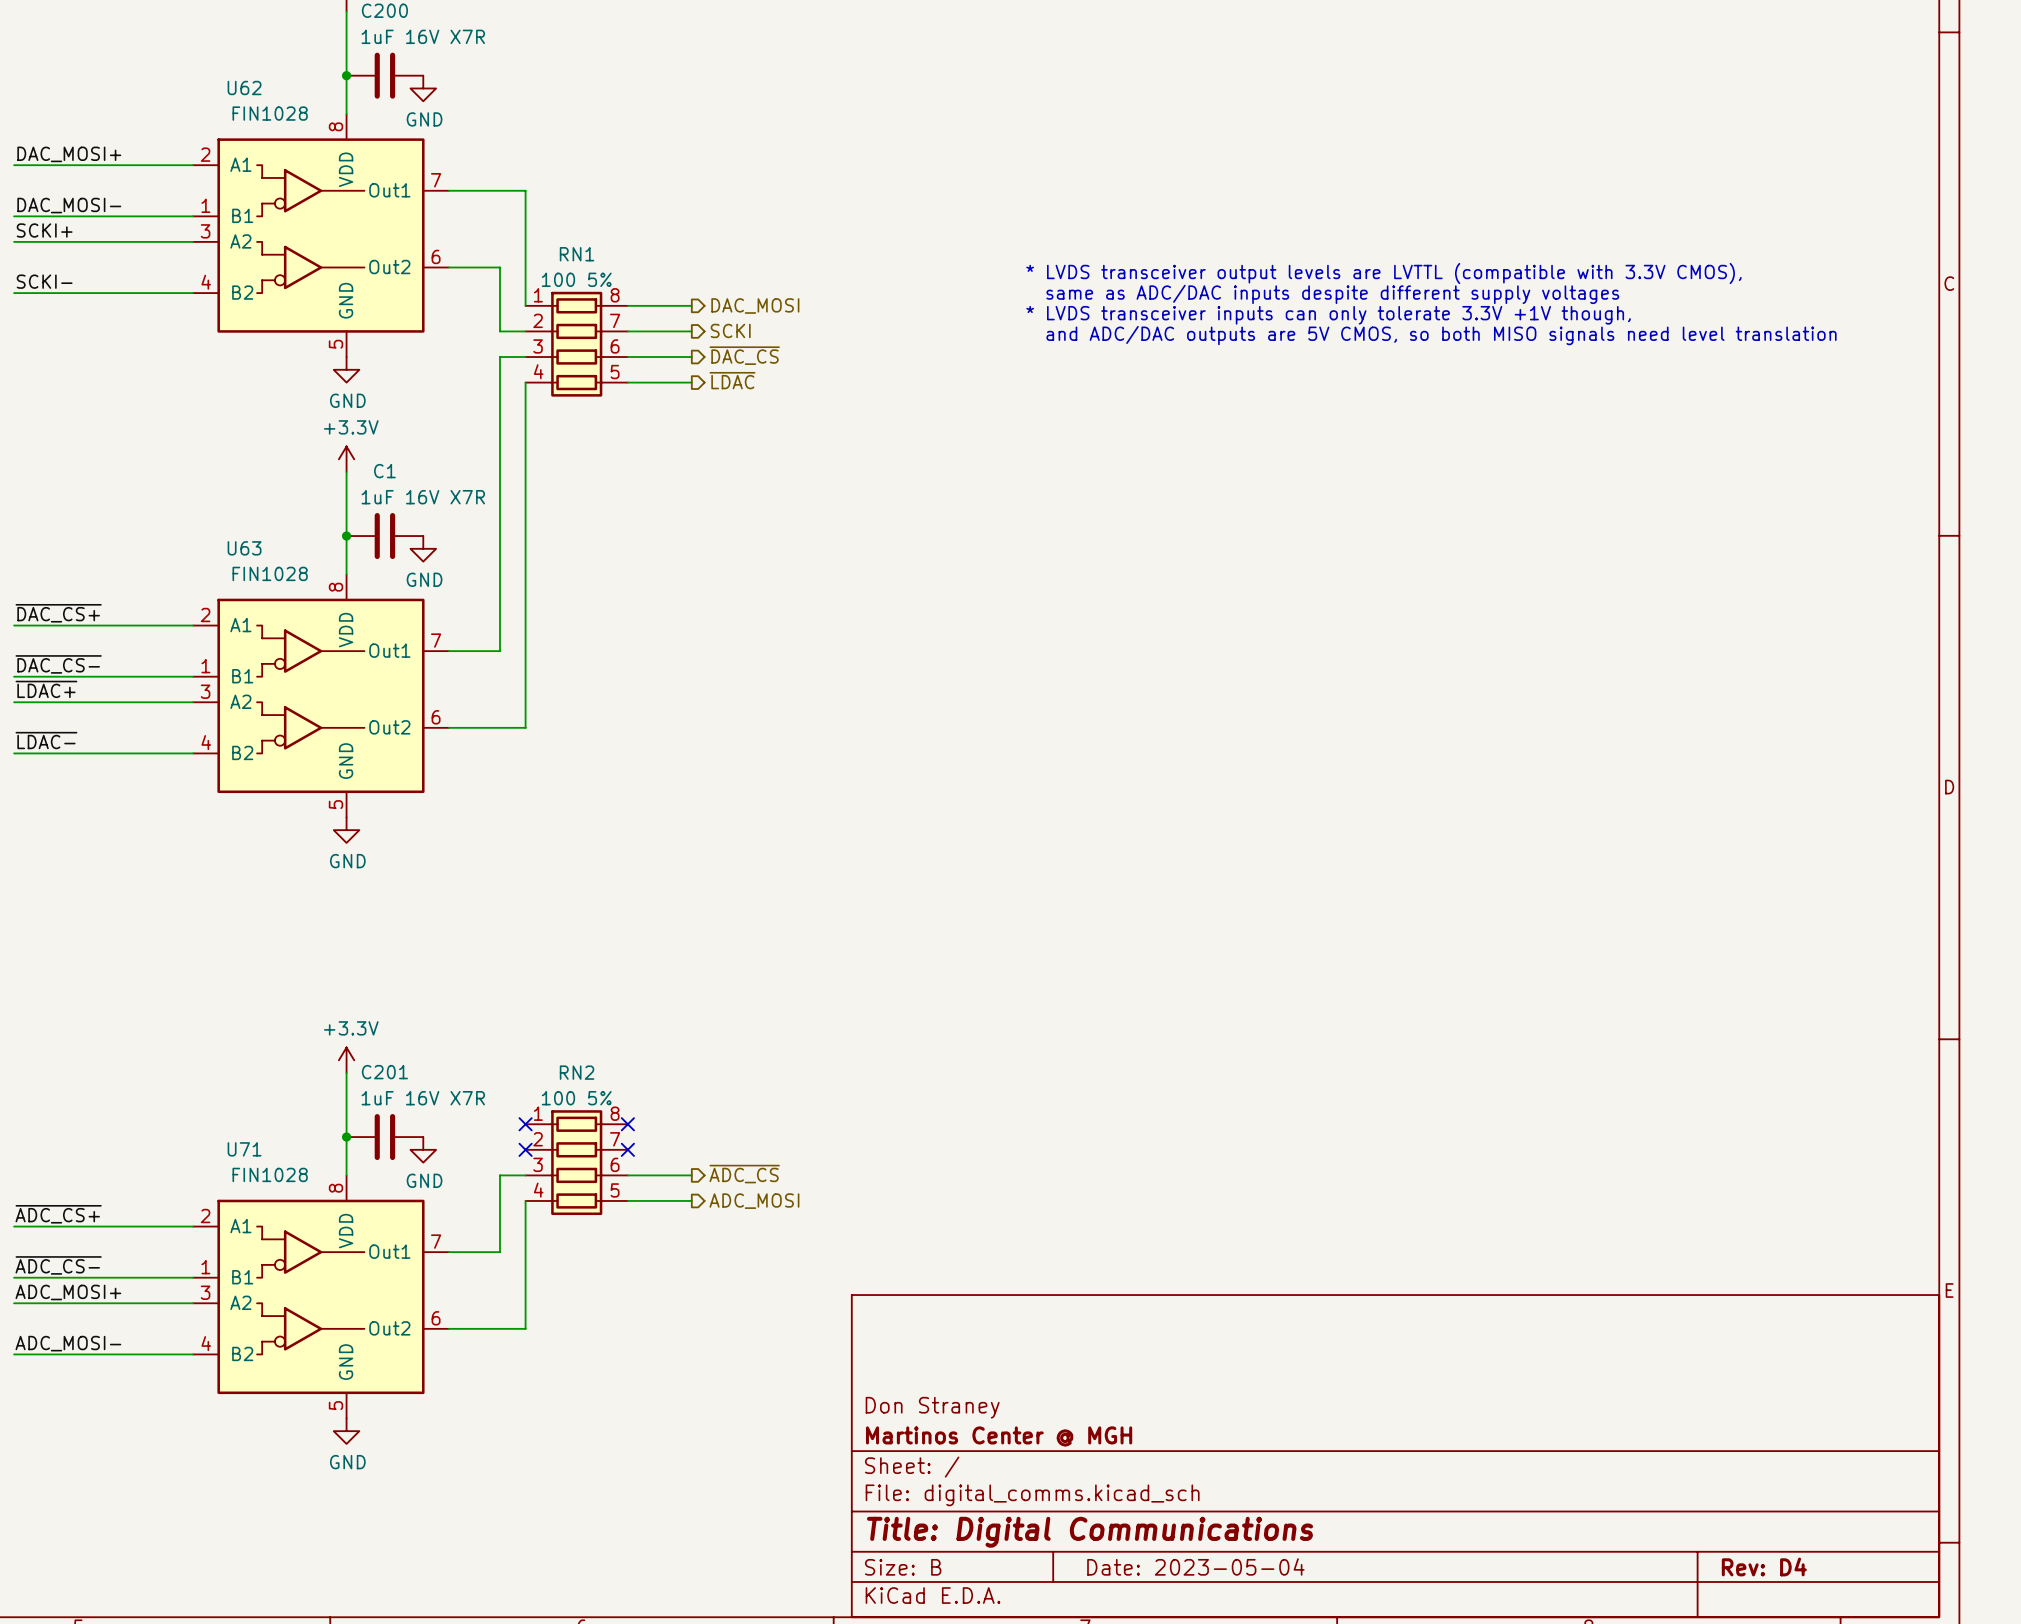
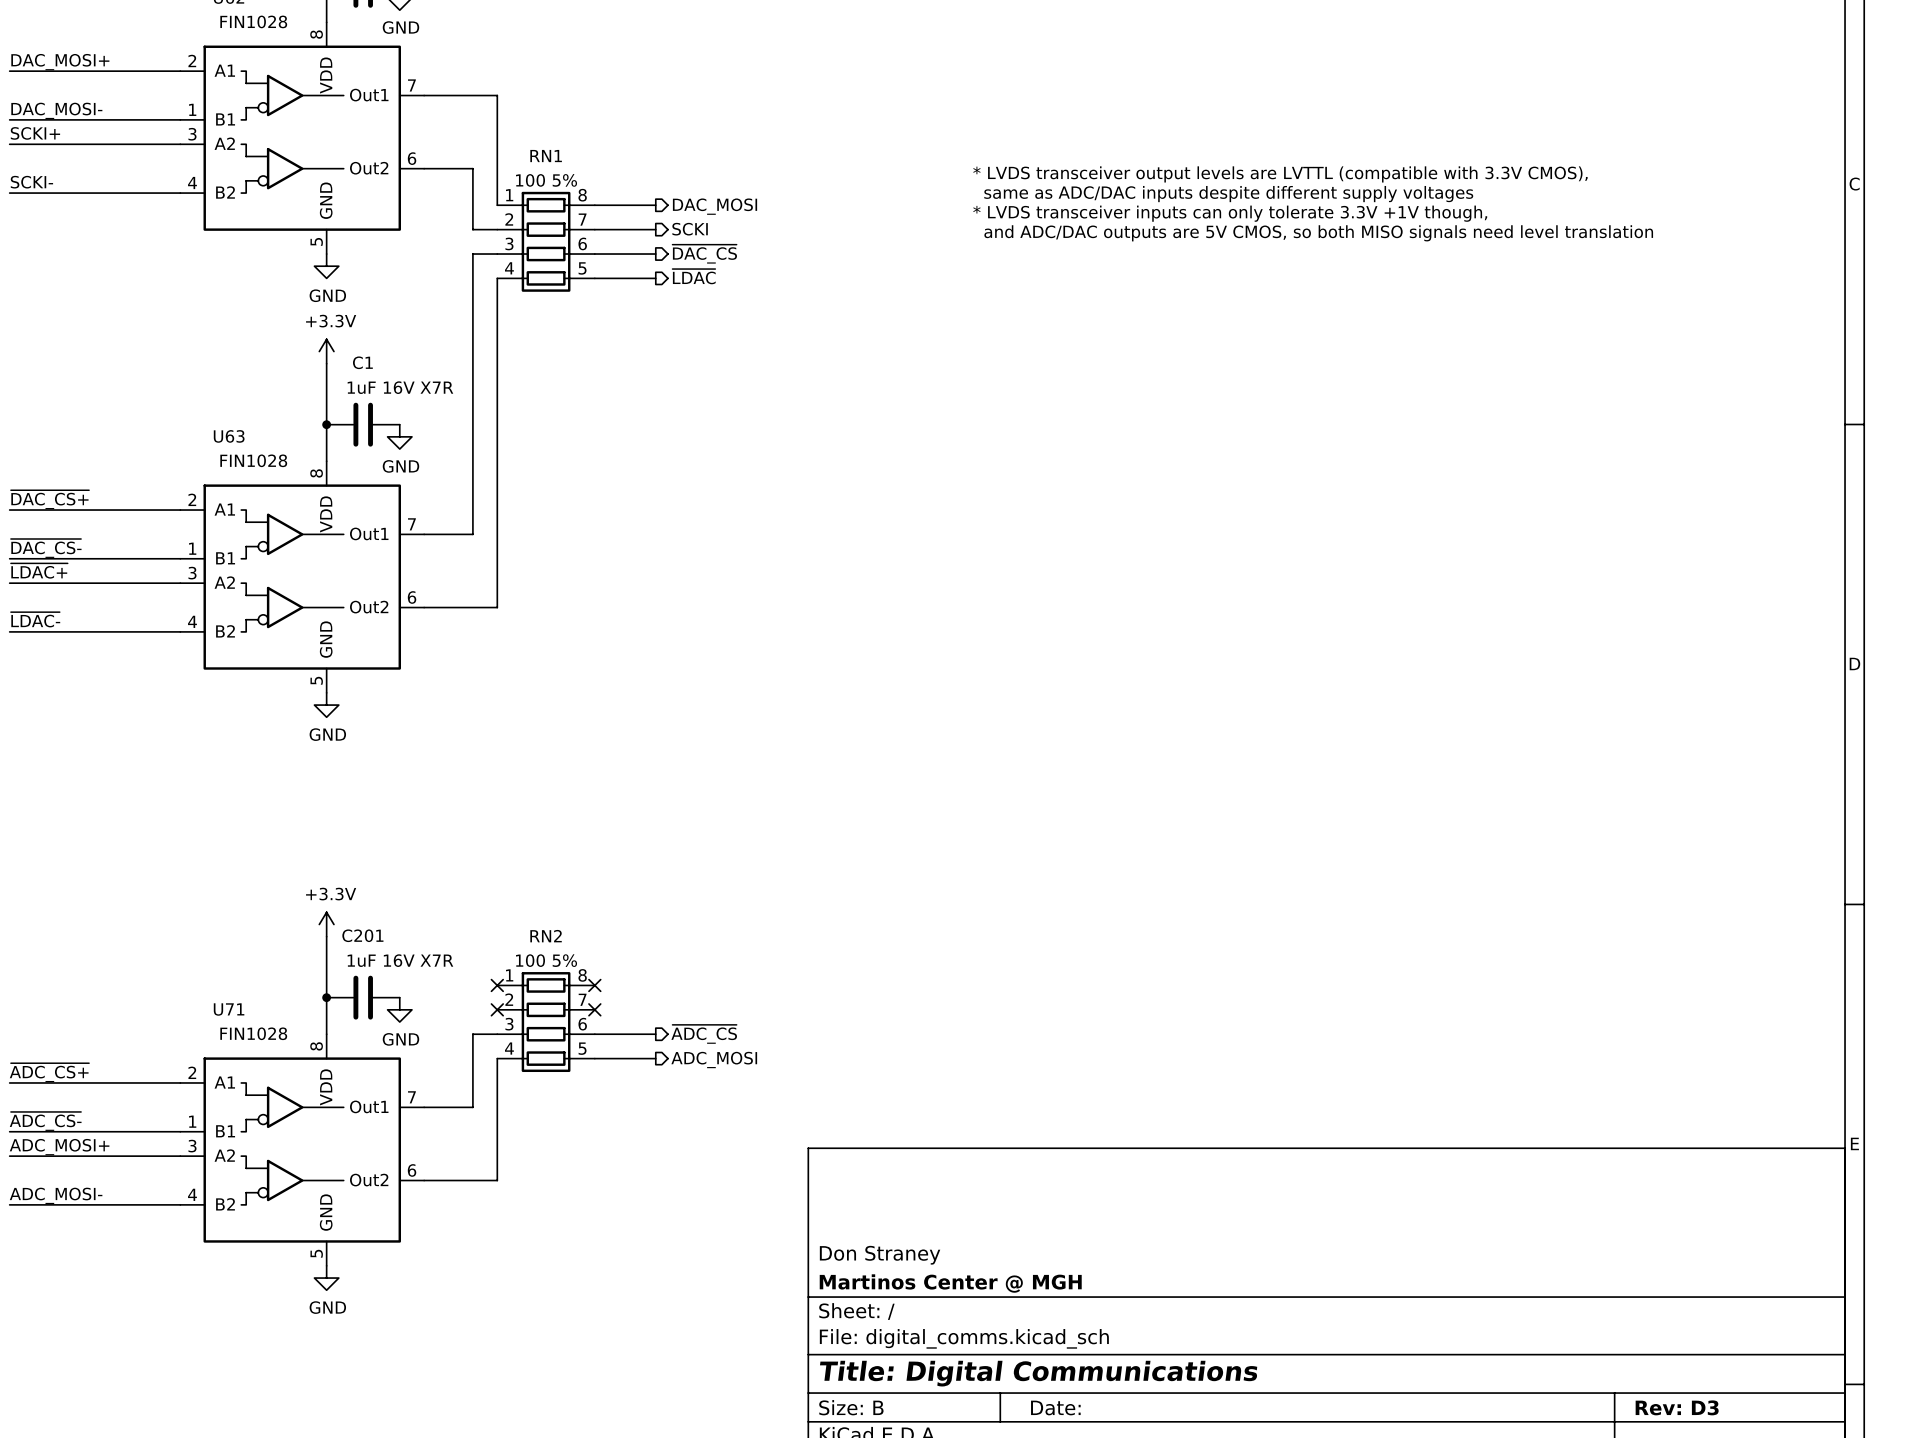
title block: Date: 2023-05-04 (1195, 1566) -> Date: (1055, 1407)
title block: Rev: D4 (1764, 1566) -> Rev: D3 (1677, 1407)

